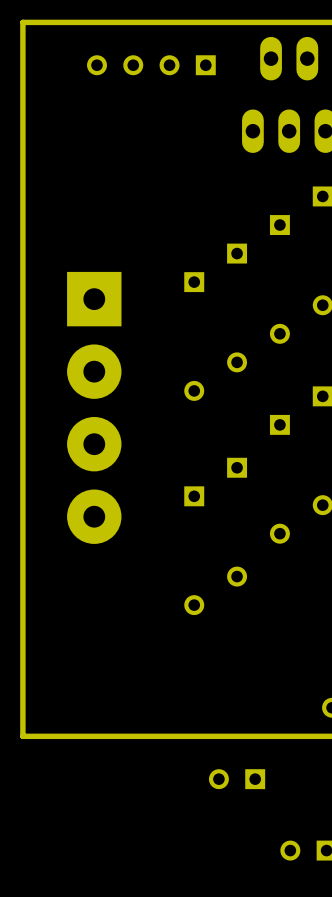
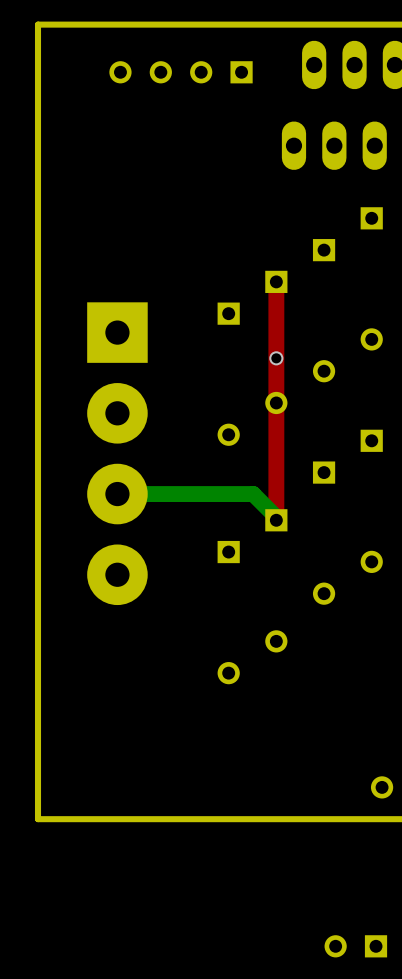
top track: none -> (276, 283) (276, 520)
via: none -> (276, 358)
bottom track: none -> (117, 494) (253, 494) (276, 517) (276, 520)
part: (237, 779) -> none

